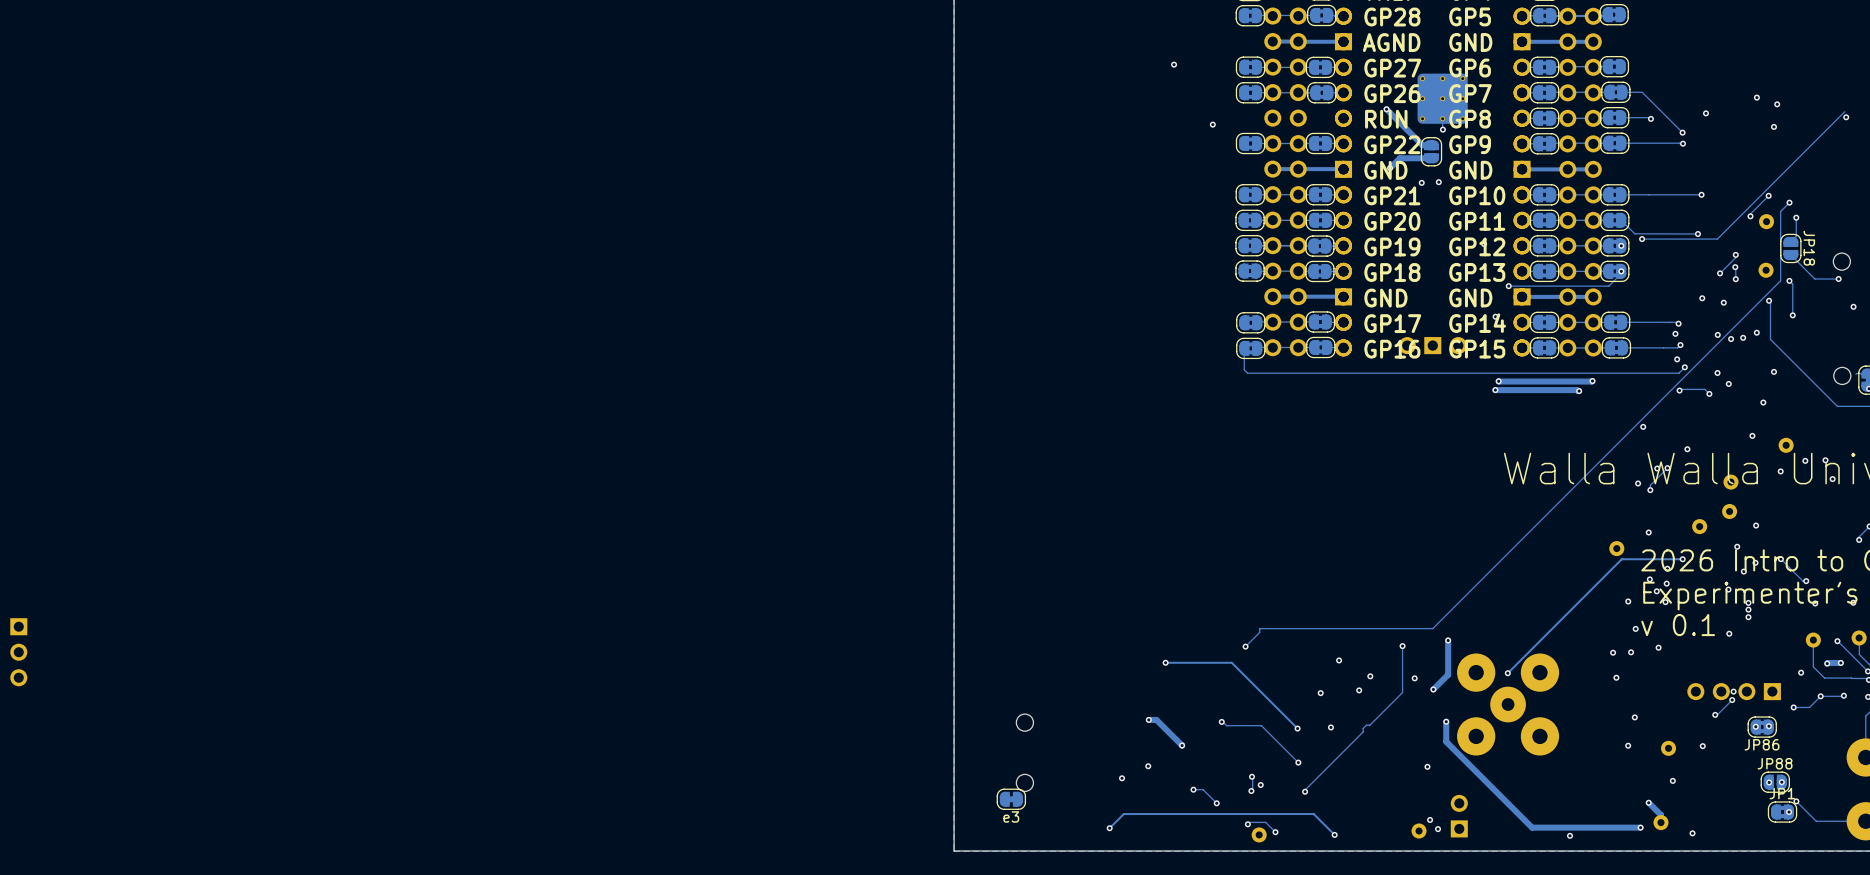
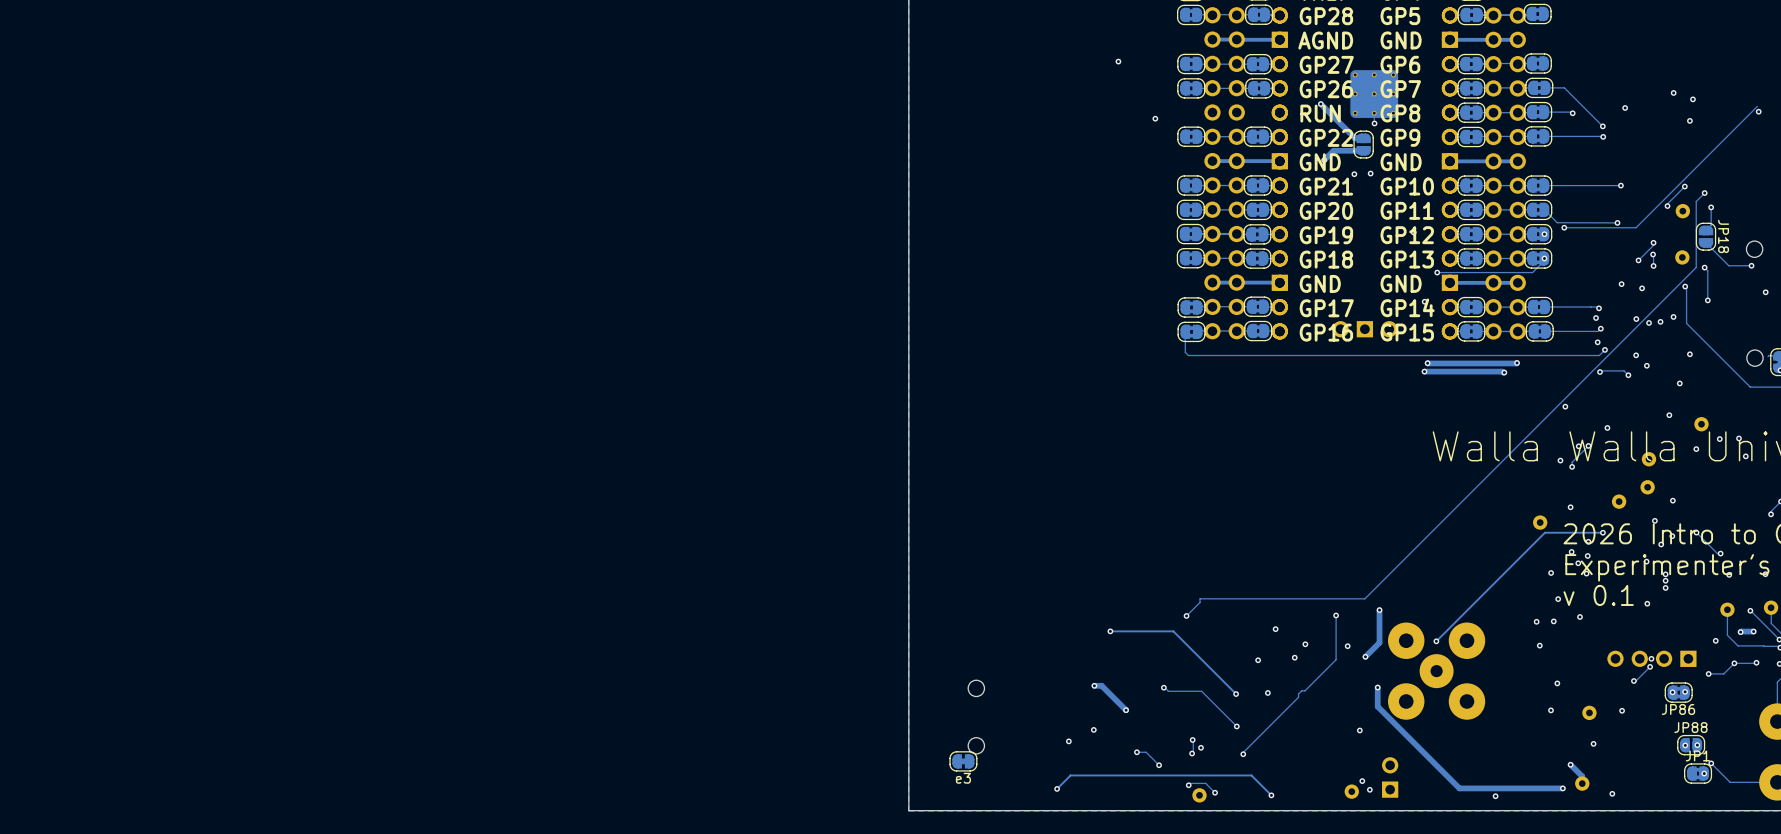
part: (18, 652) -> none

